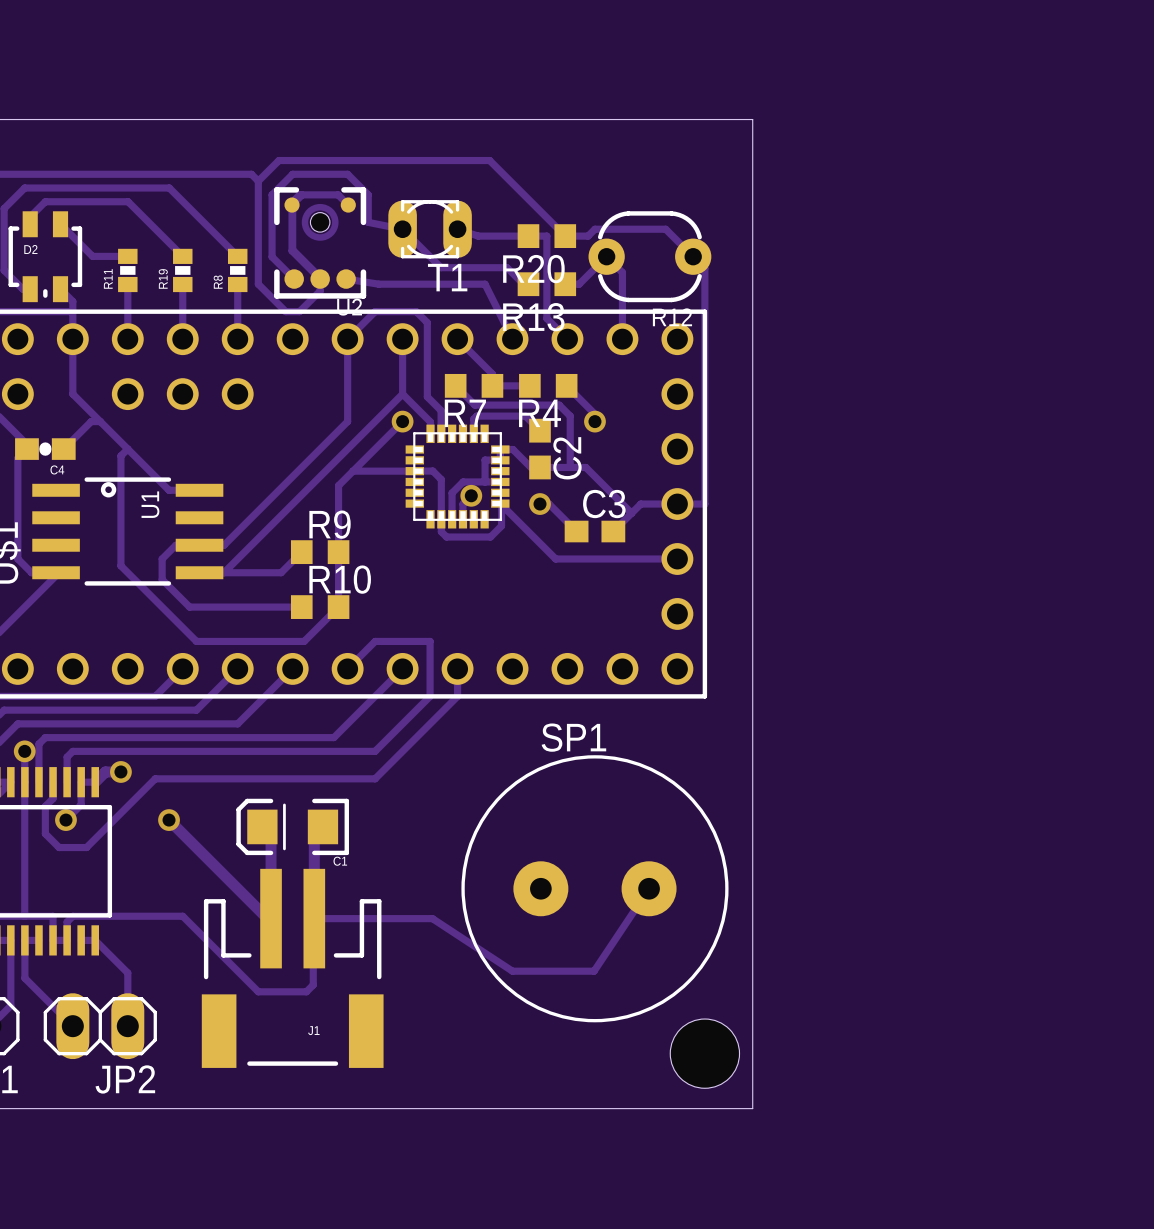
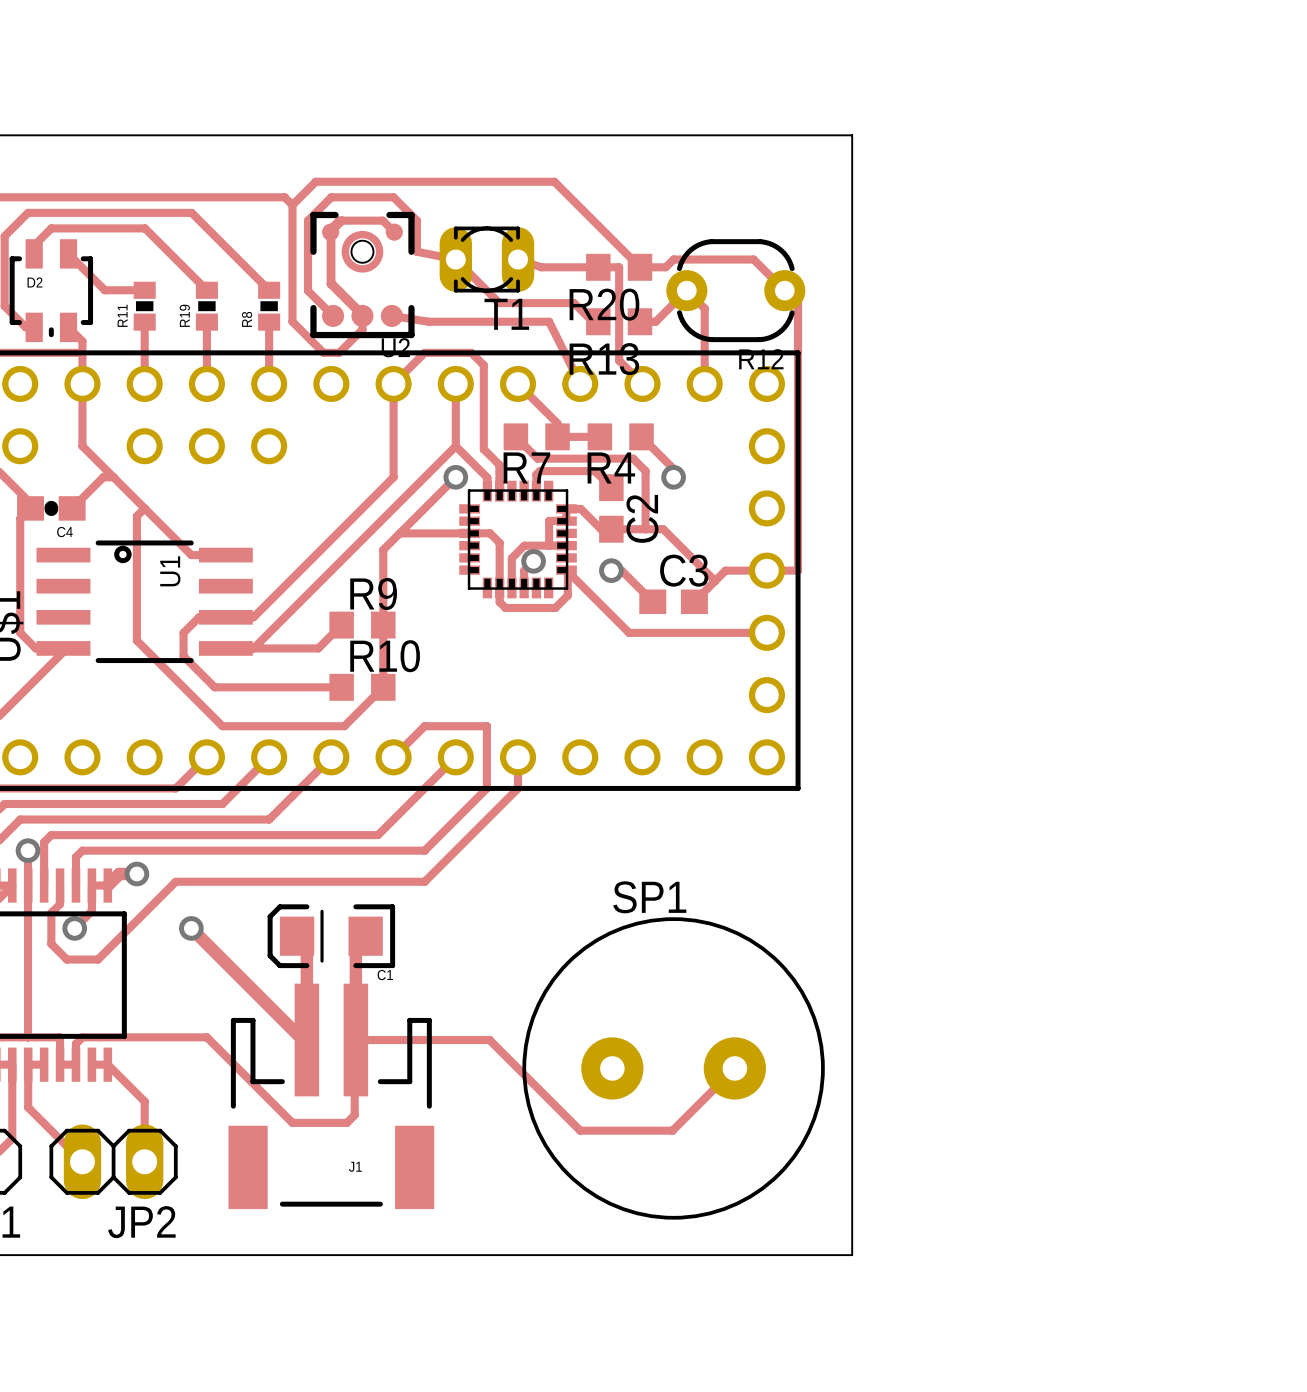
SP1 position: (594, 888) -> (673, 1068)
track: (649, 888) (594, 971) (512, 971) (432, 918) -> (734, 1068) (672, 1130) (580, 1130) (489, 1040)
hole: (704, 1053) -> none

